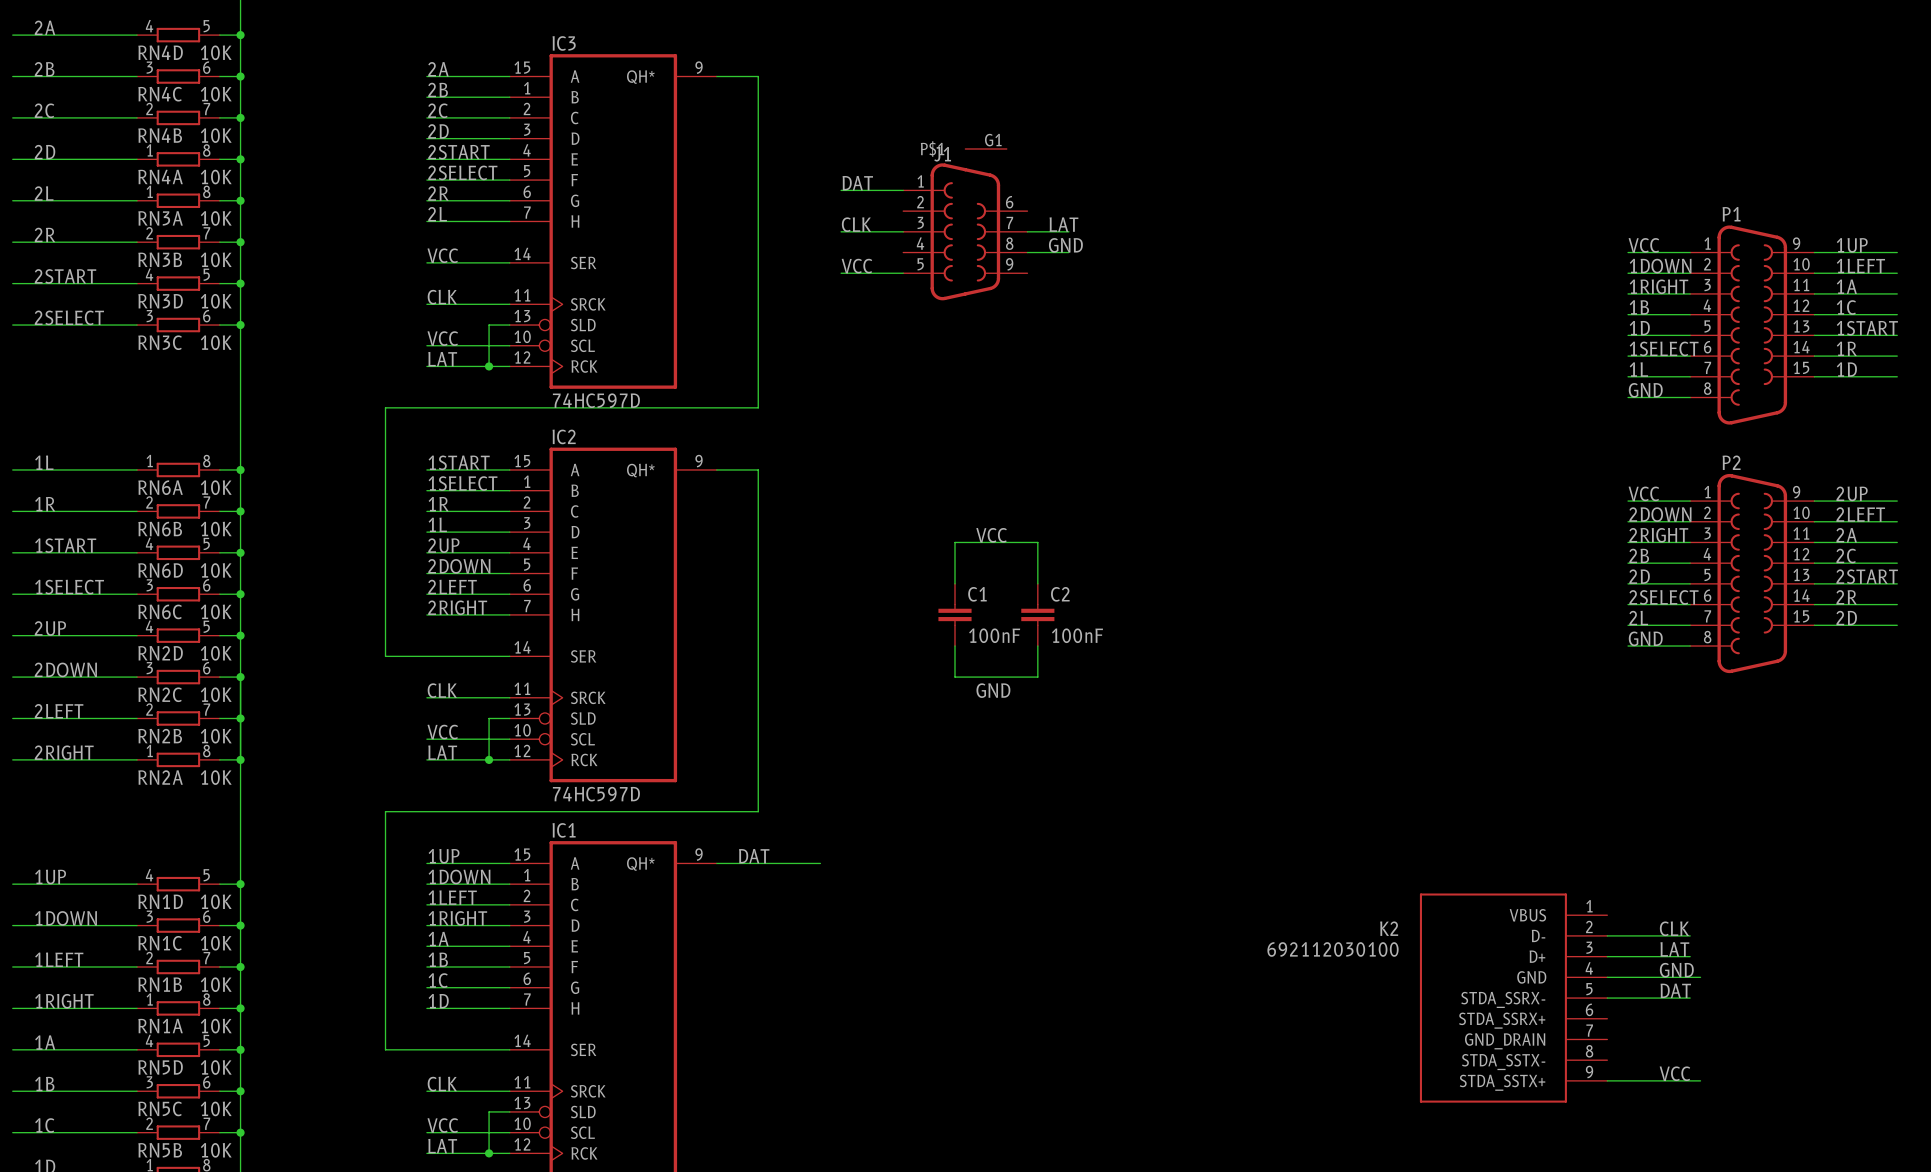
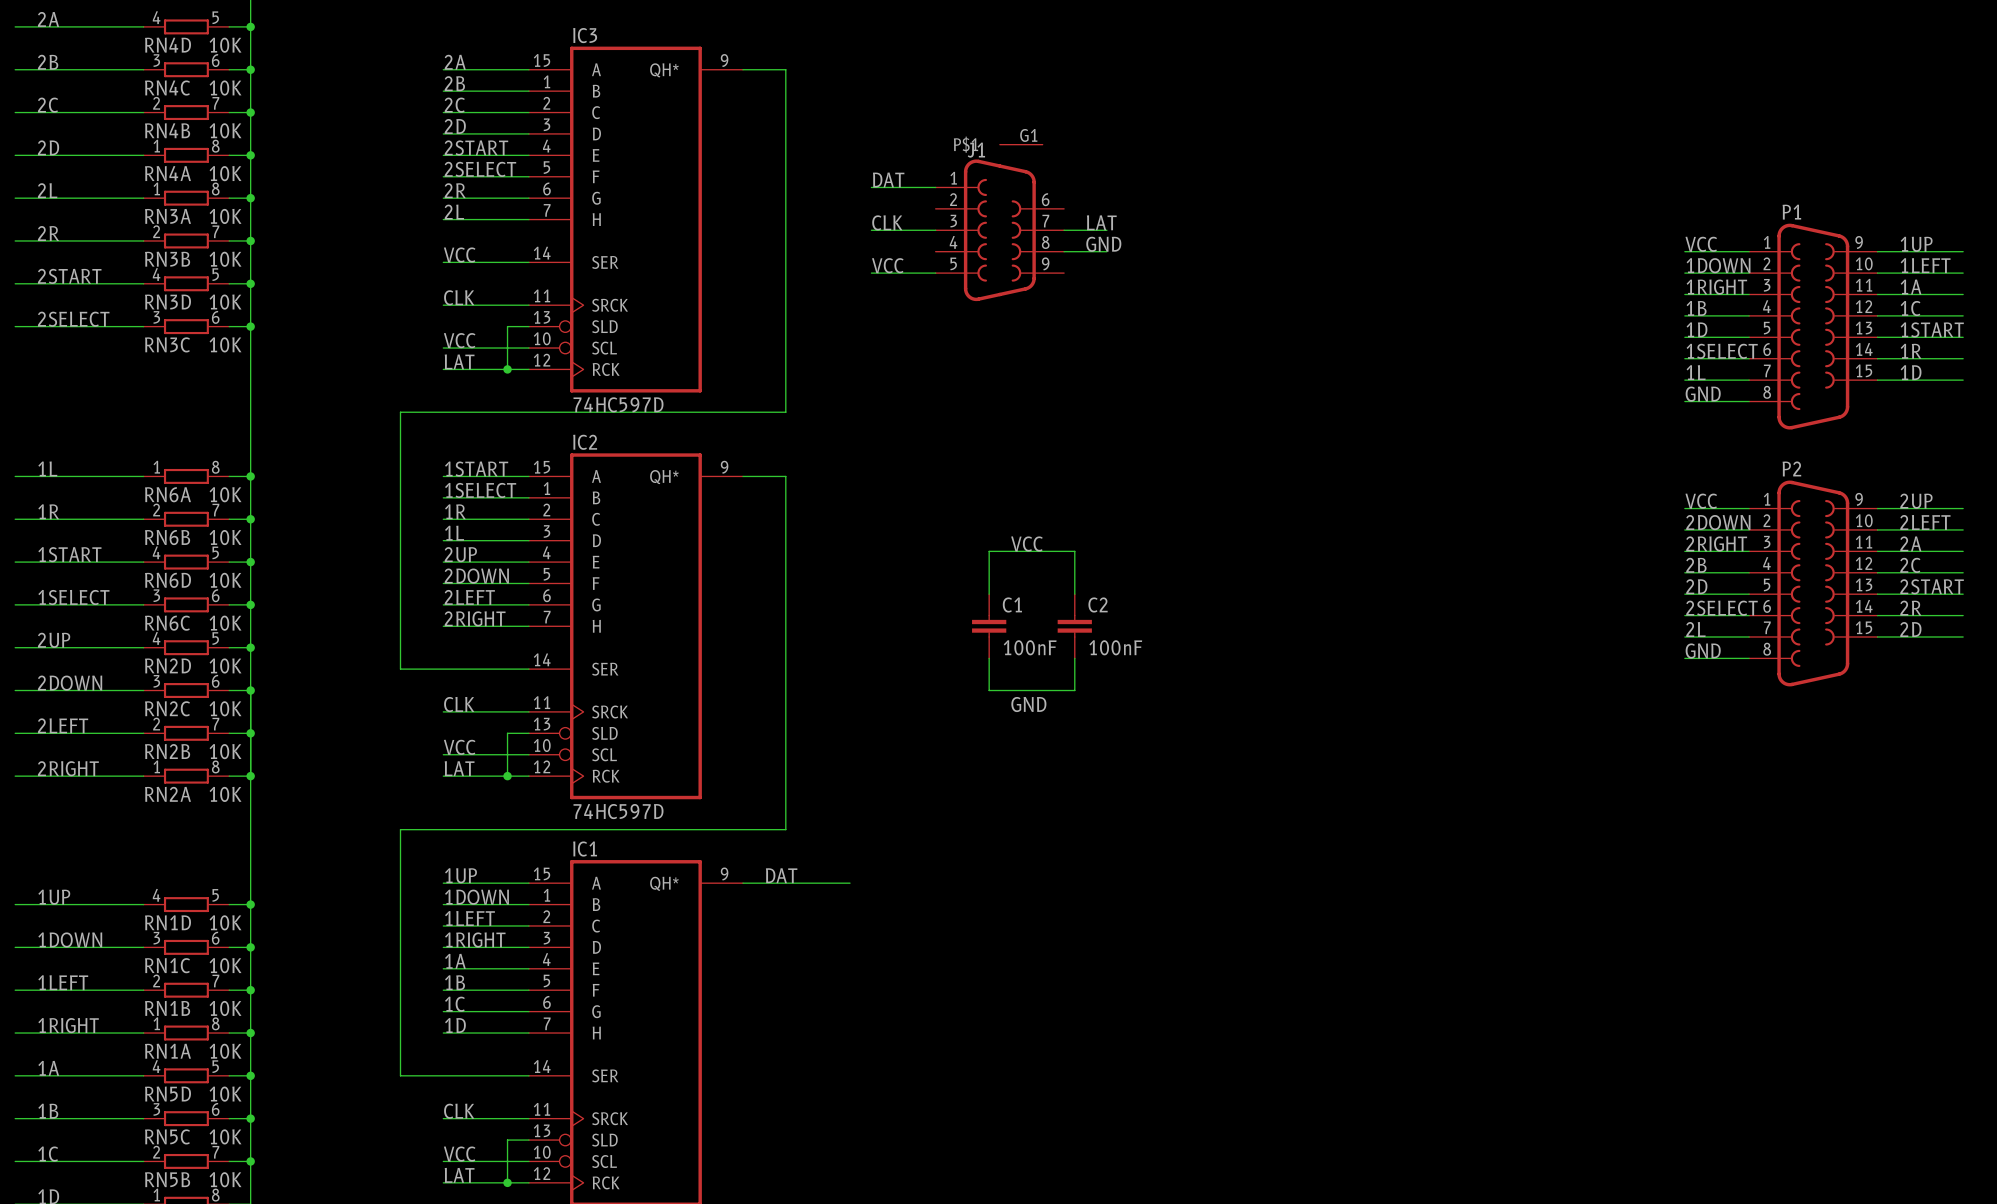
label: CLK (1674, 928) -> none
wire: (1607, 935) (1690, 935) -> none
label: LAT (1674, 949) -> none
wire: (1607, 956) (1690, 956) -> none
label: GND (1676, 970) -> none
wire: (1607, 977) (1700, 977) -> none
label: DAT (1675, 990) -> none
K2: 692112030100 (1513, 998) -> none
wire: (1607, 998) (1690, 998) -> none
label: VCC (1674, 1073) -> none
wire: (1607, 1080) (1700, 1080) -> none

